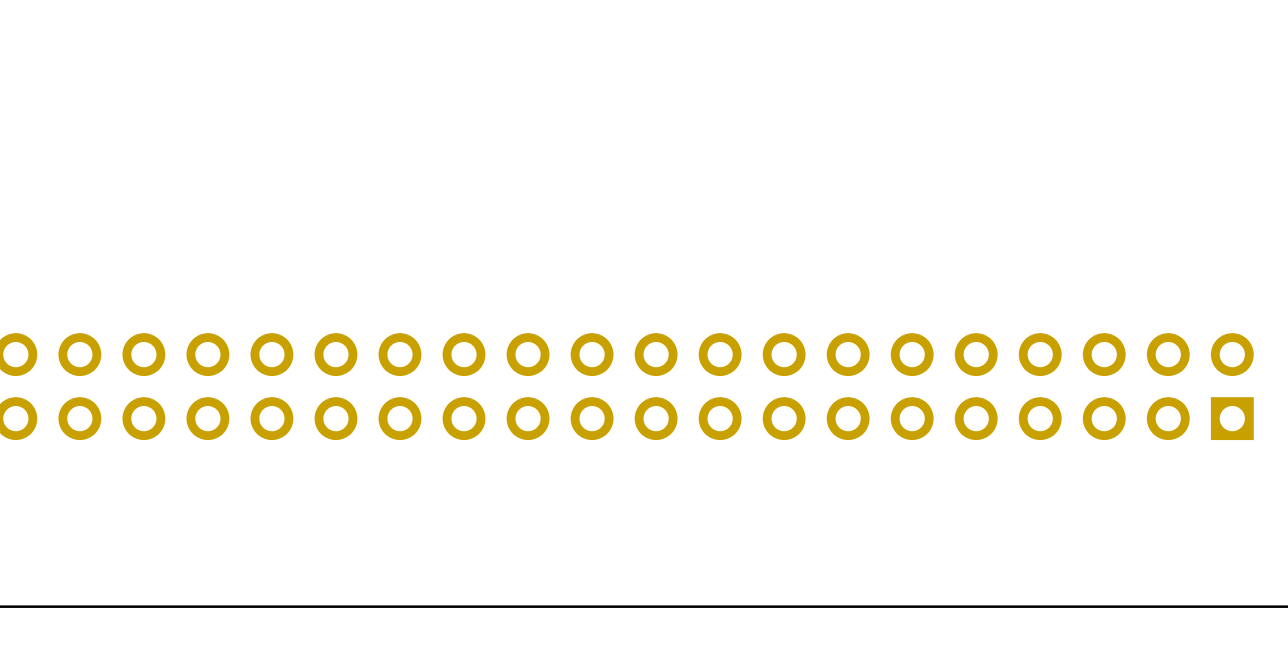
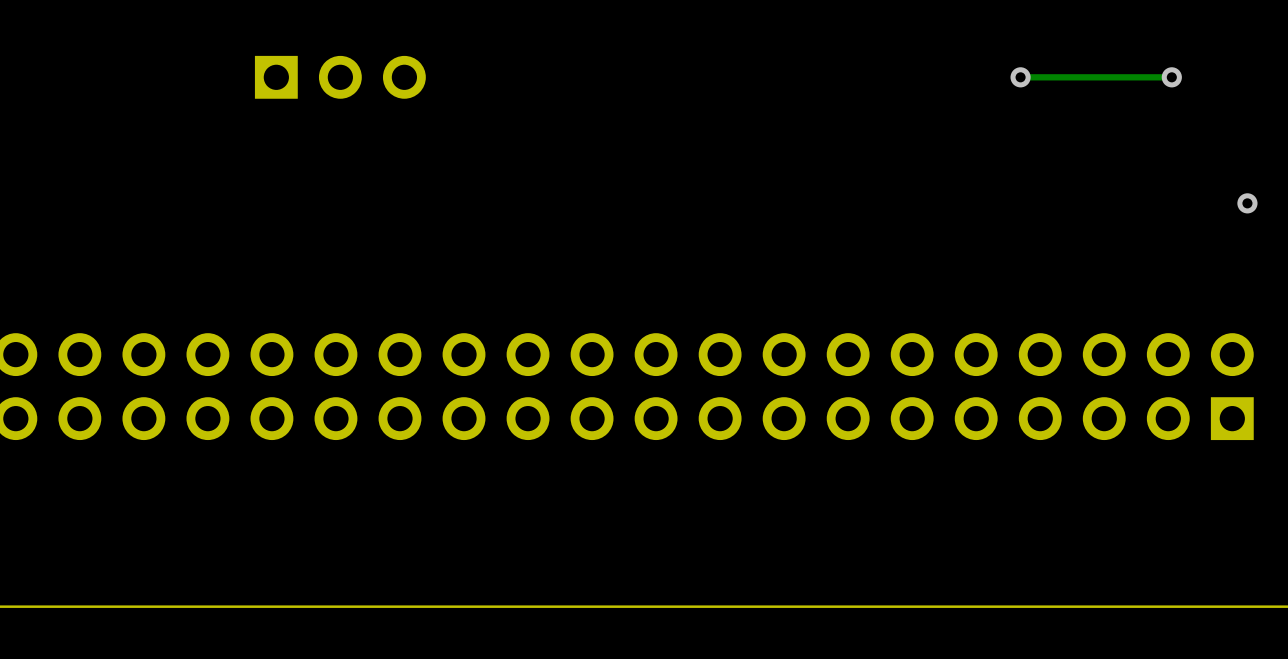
part: none -> (340, 77)
via: none -> (1020, 77)
track: none -> (1171, 77) (1020, 77)
via: none -> (1171, 77)
via: none -> (1247, 203)

